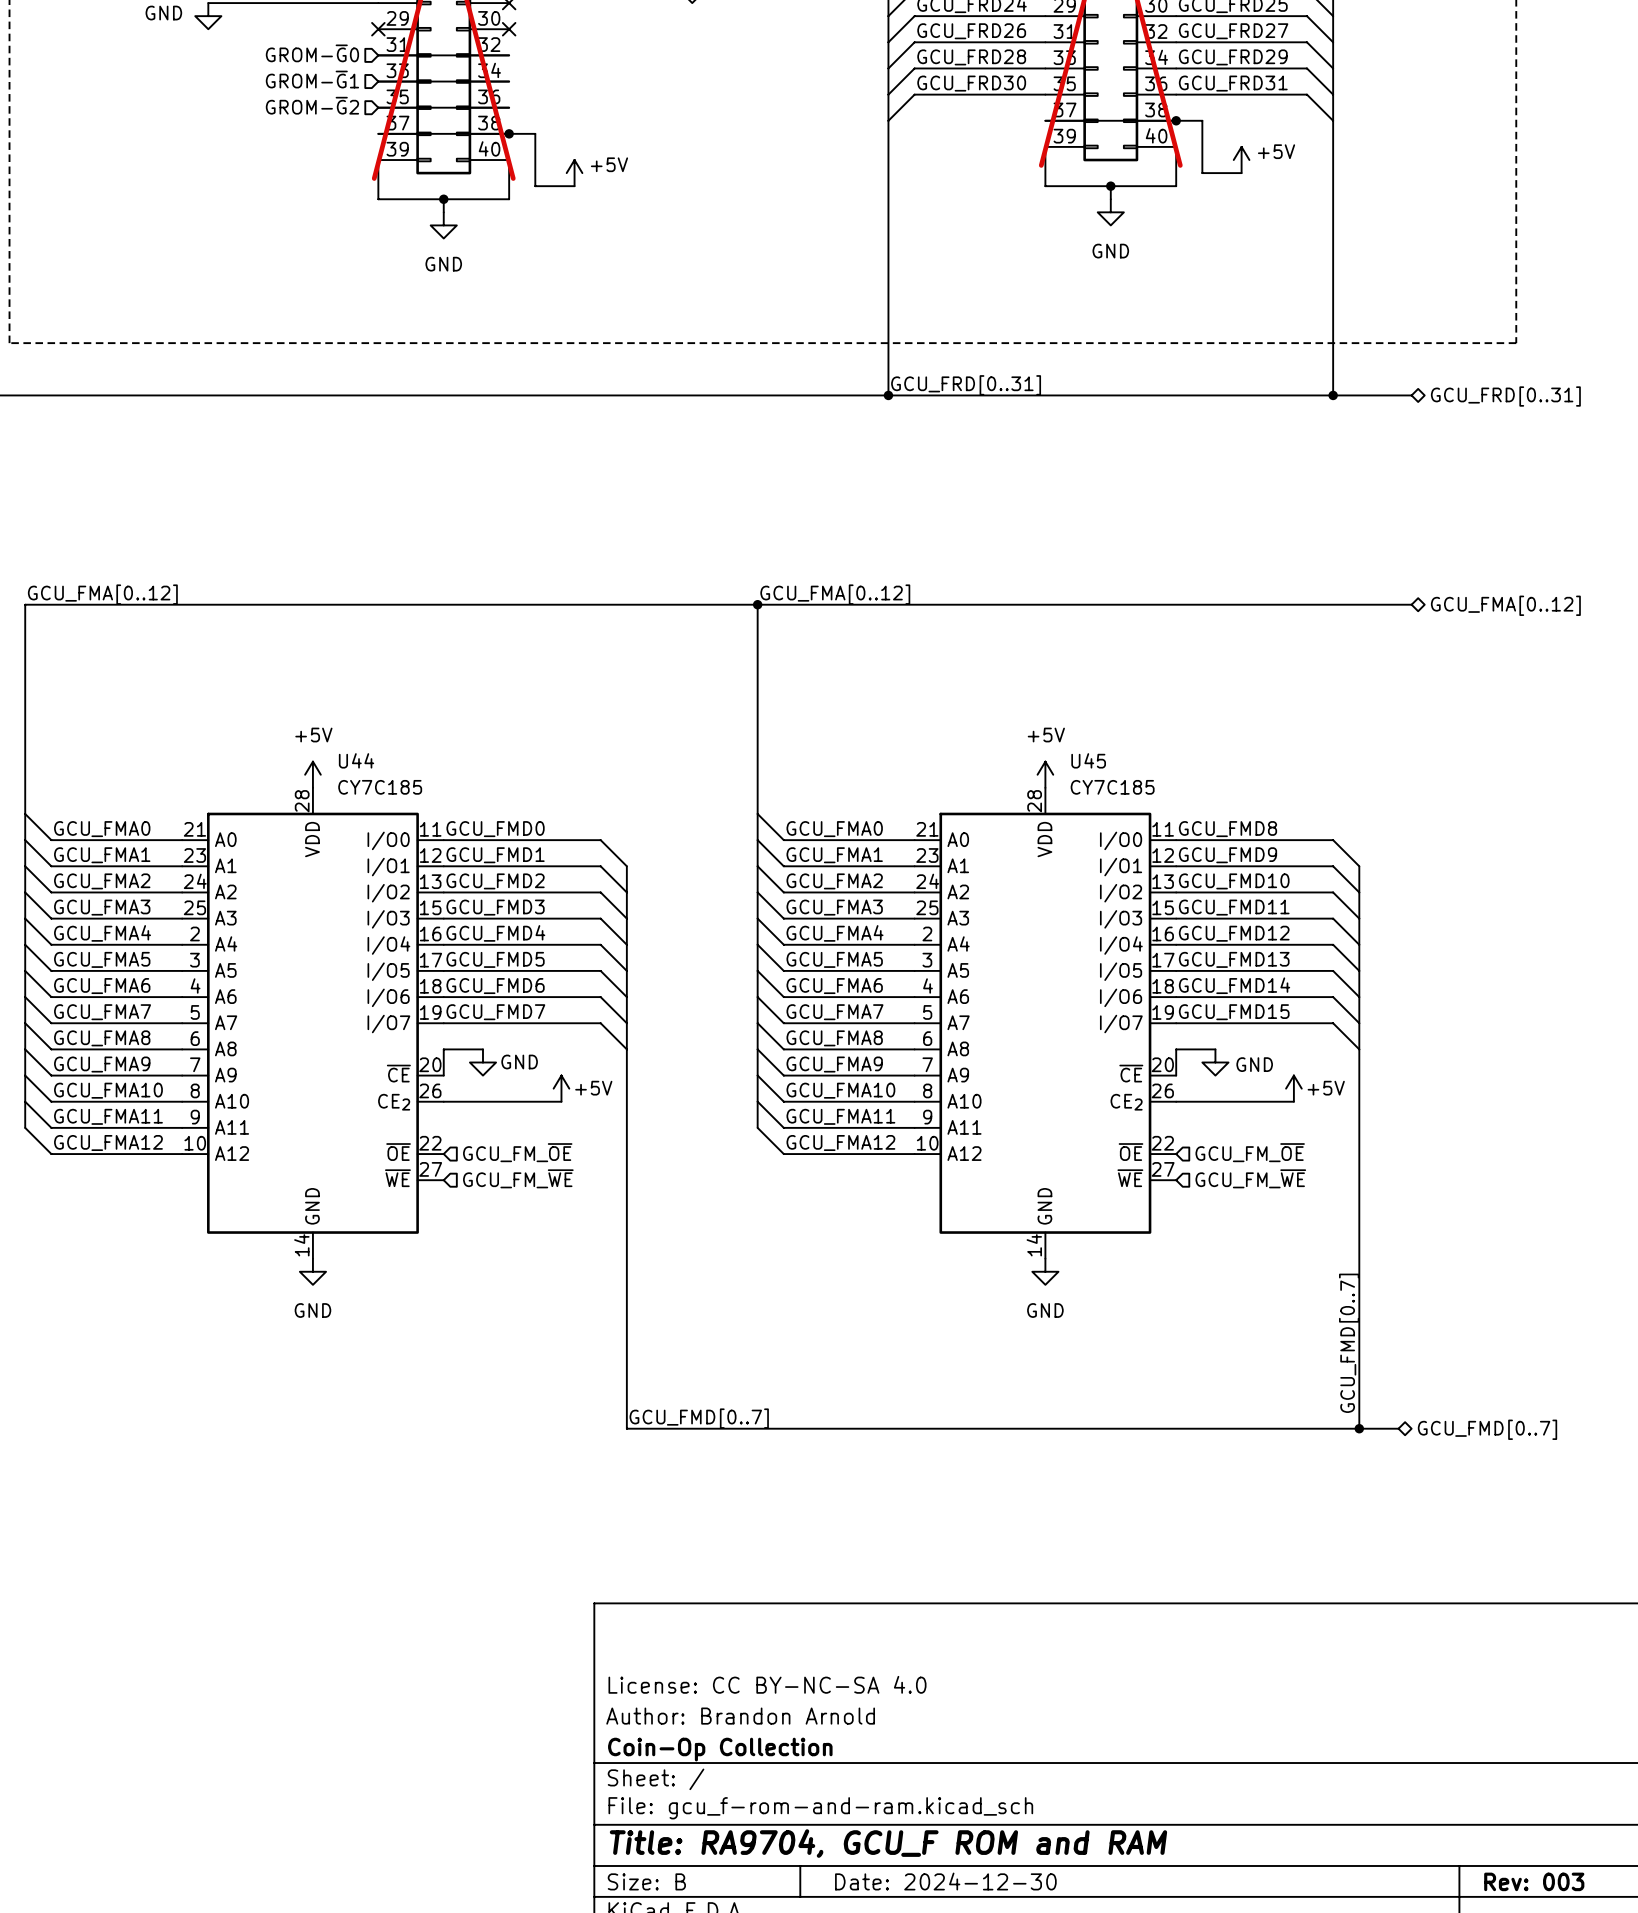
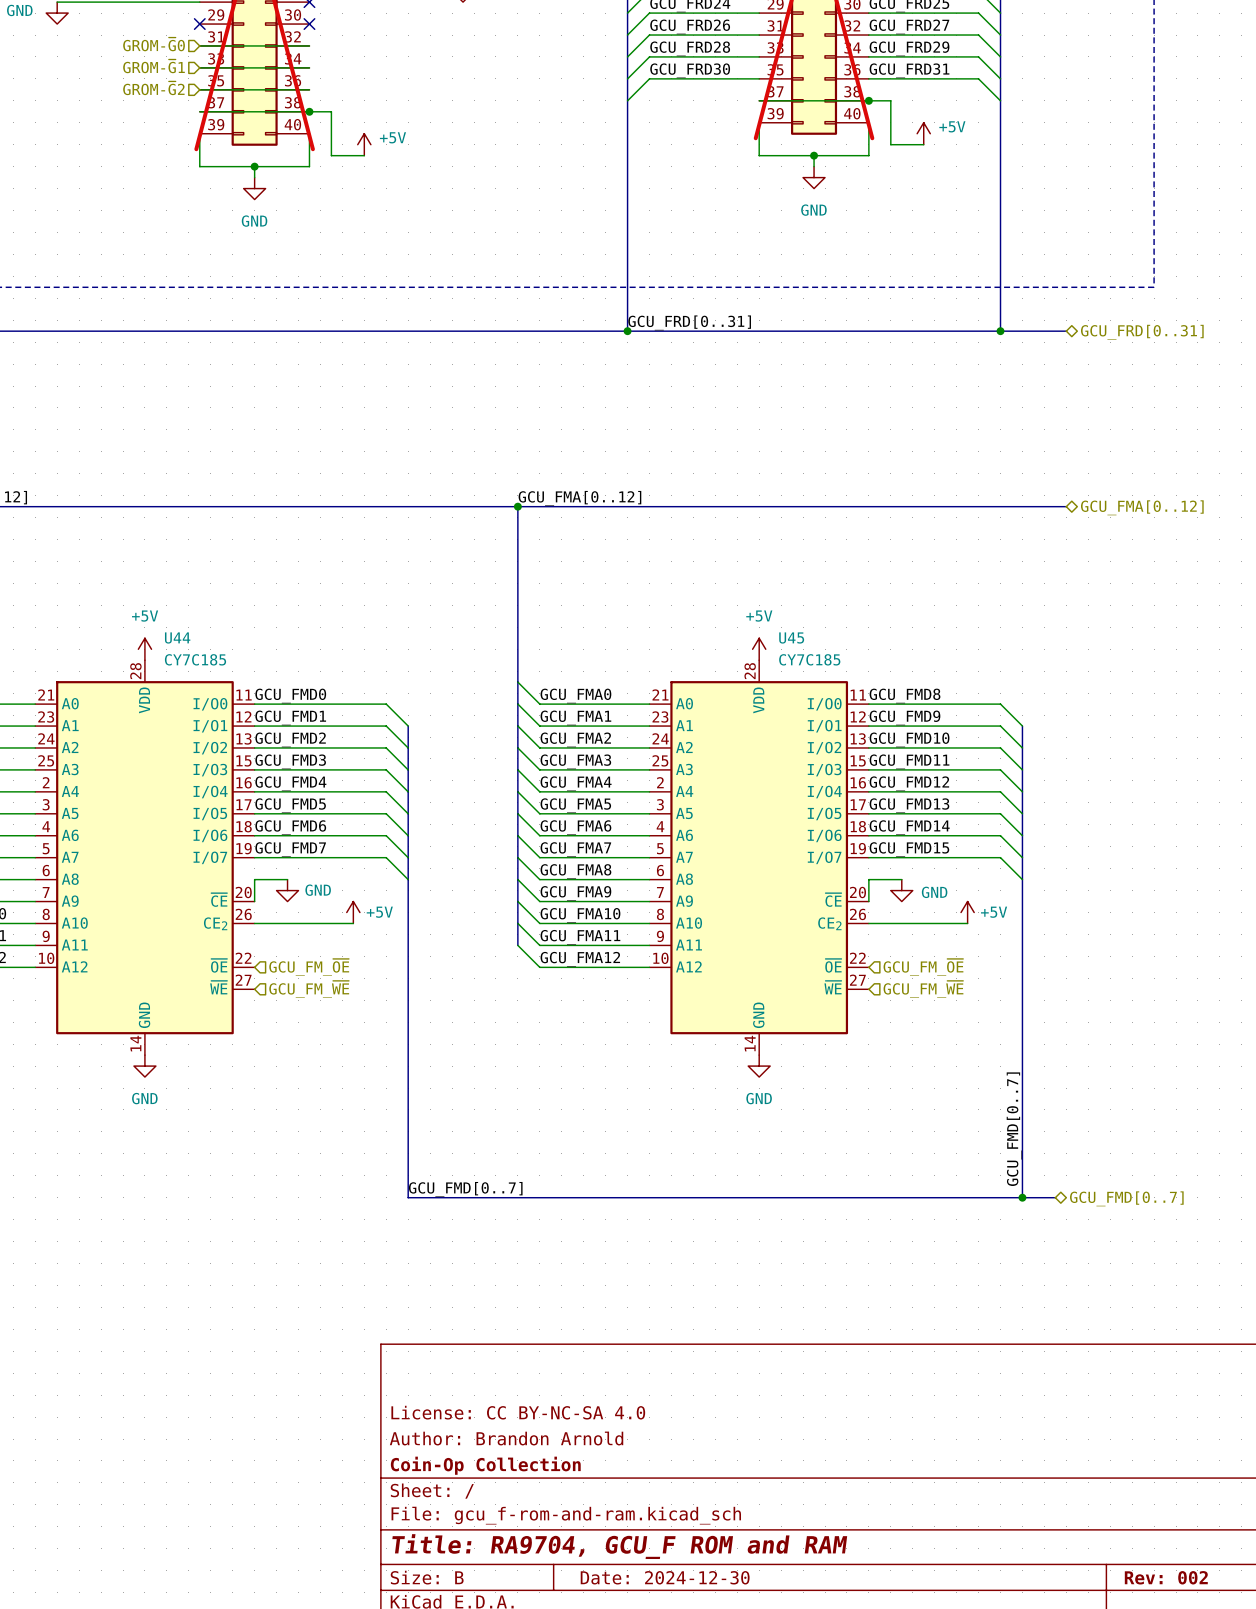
title block: Rev: 003 (1534, 1881) -> Rev: 002 (1166, 1577)

